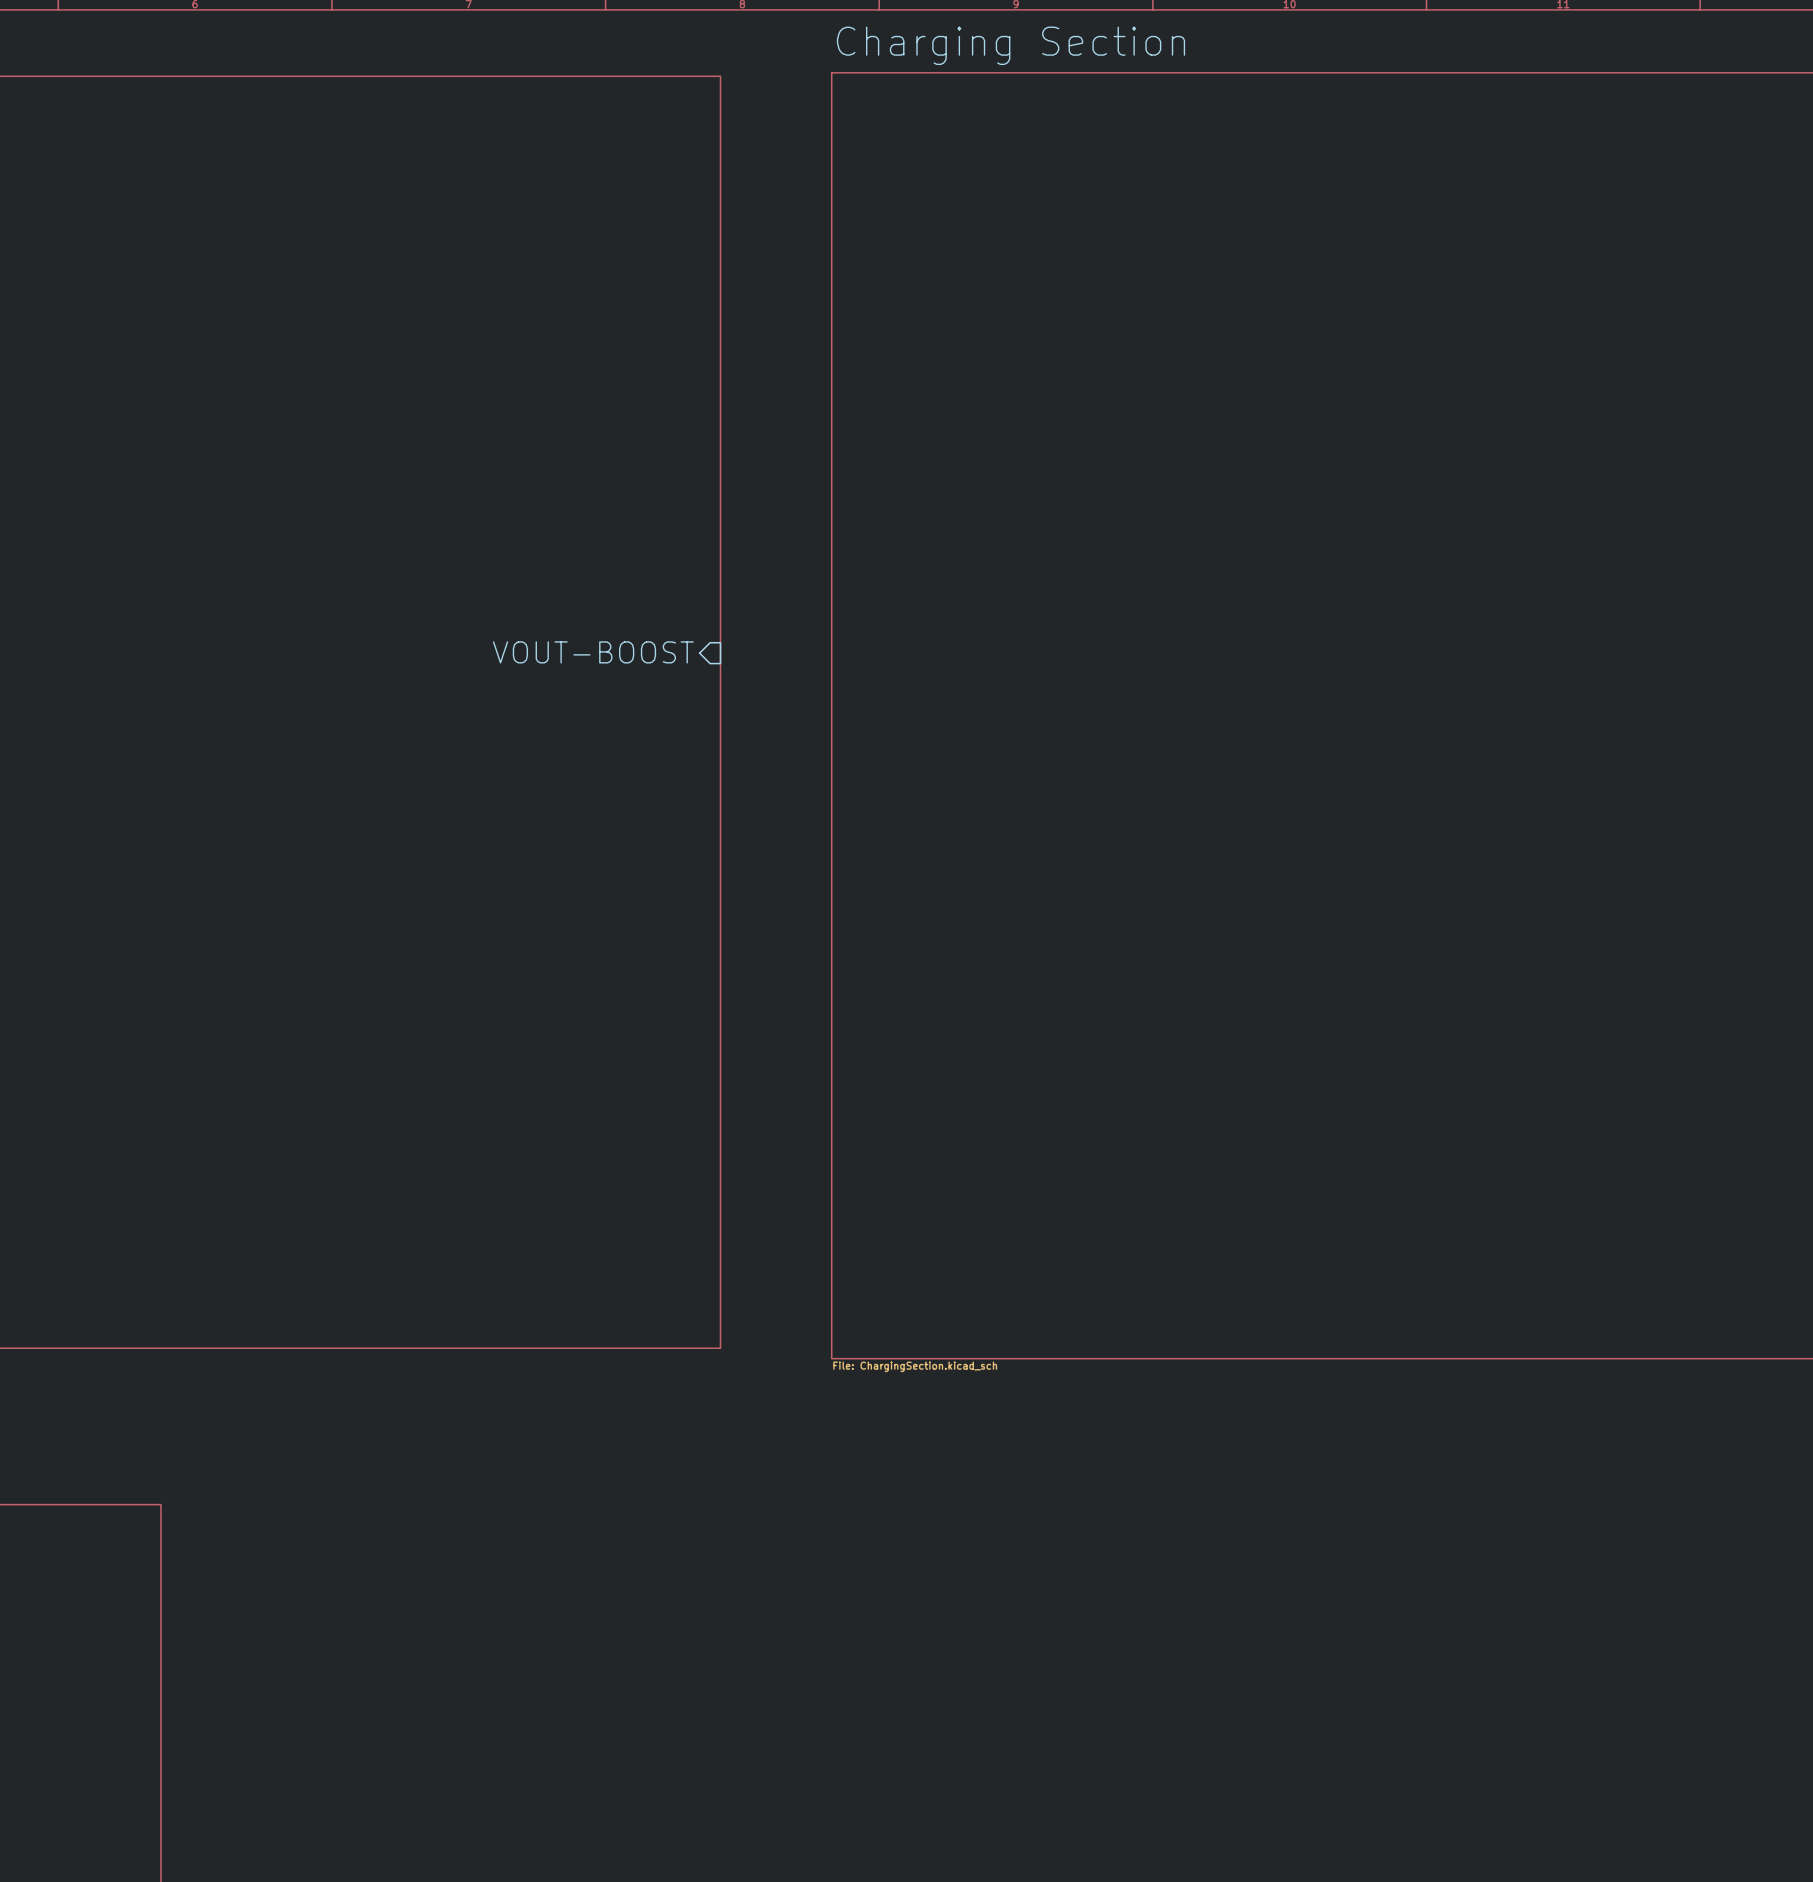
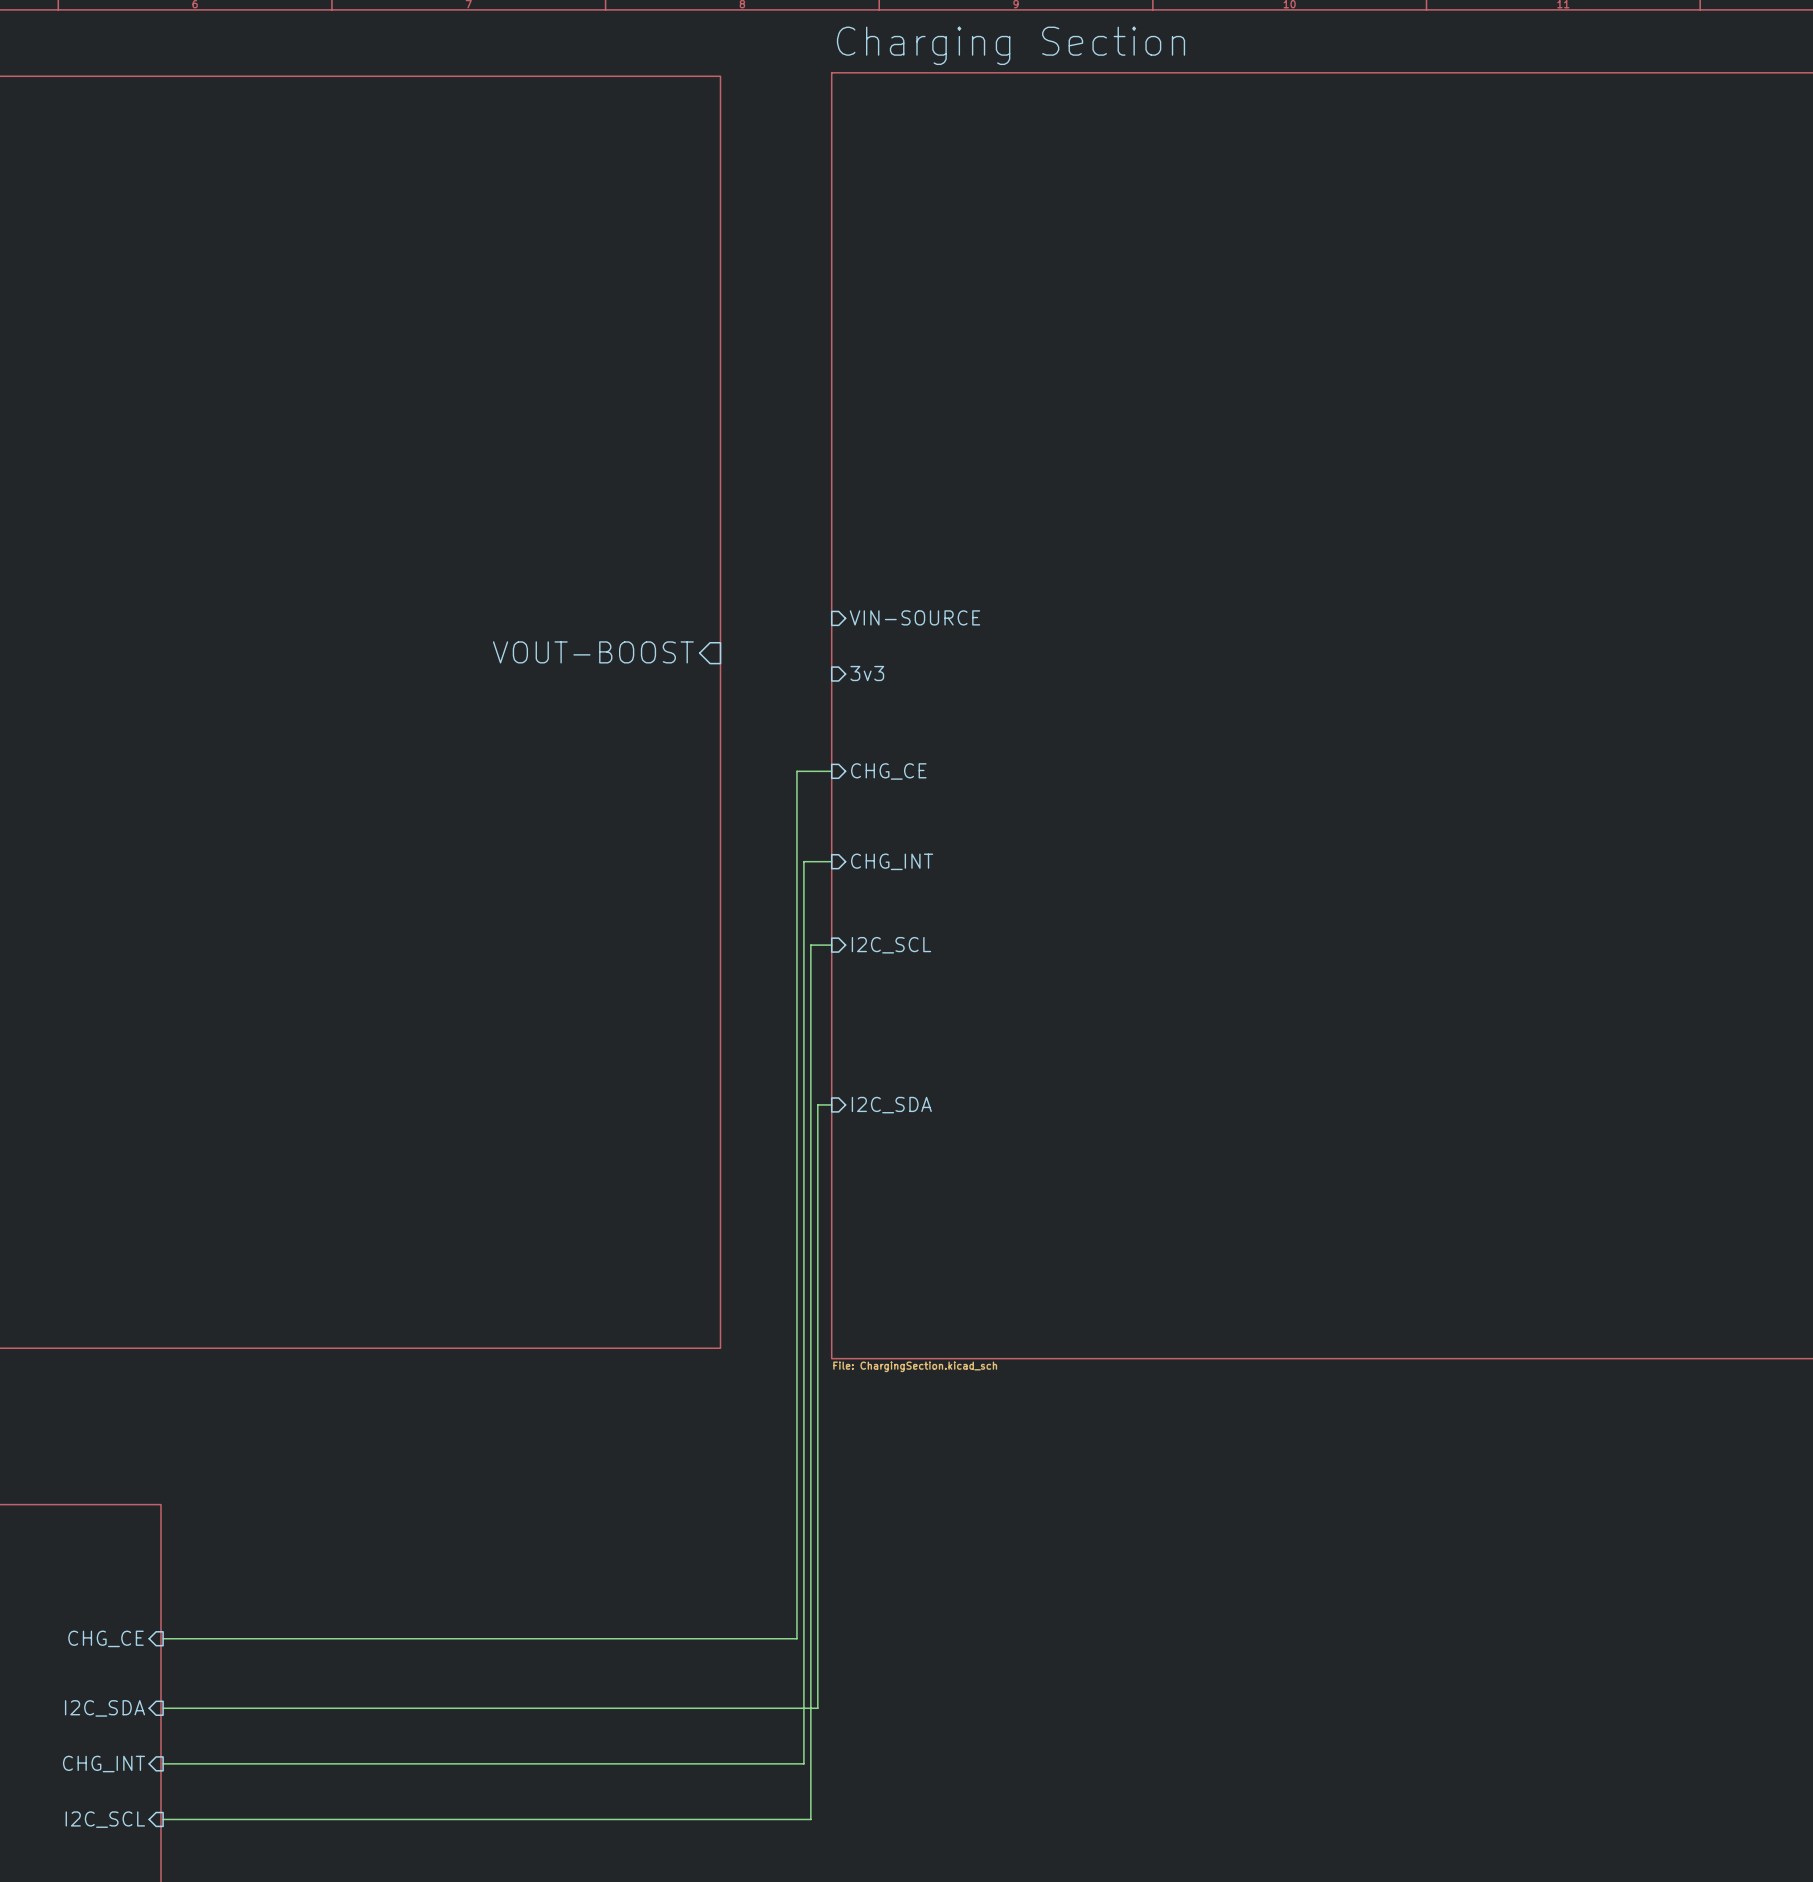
sheet pin: none -> VIN-SOURCE (914, 617)
sheet pin: none -> 3v3 (867, 673)
wire: none -> (831, 771) (796, 771) (796, 1638) (163, 1638)
sheet pin: none -> CHG_CE (888, 771)
wire: none -> (831, 861) (803, 861) (803, 1763) (163, 1763)
sheet pin: none -> CHG_INT (892, 861)
wire: none -> (831, 945) (810, 945) (810, 1819) (163, 1819)
sheet pin: none -> I2C_SCL (891, 945)
wire: none -> (831, 1104) (817, 1104) (817, 1708) (163, 1708)
sheet pin: none -> I2C_SDA (891, 1105)
sheet pin: none -> CHG_CE (105, 1638)
sheet pin: none -> I2C_SDA (104, 1708)
sheet pin: none -> CHG_INT (104, 1764)
sheet pin: none -> I2C_SCL (105, 1819)

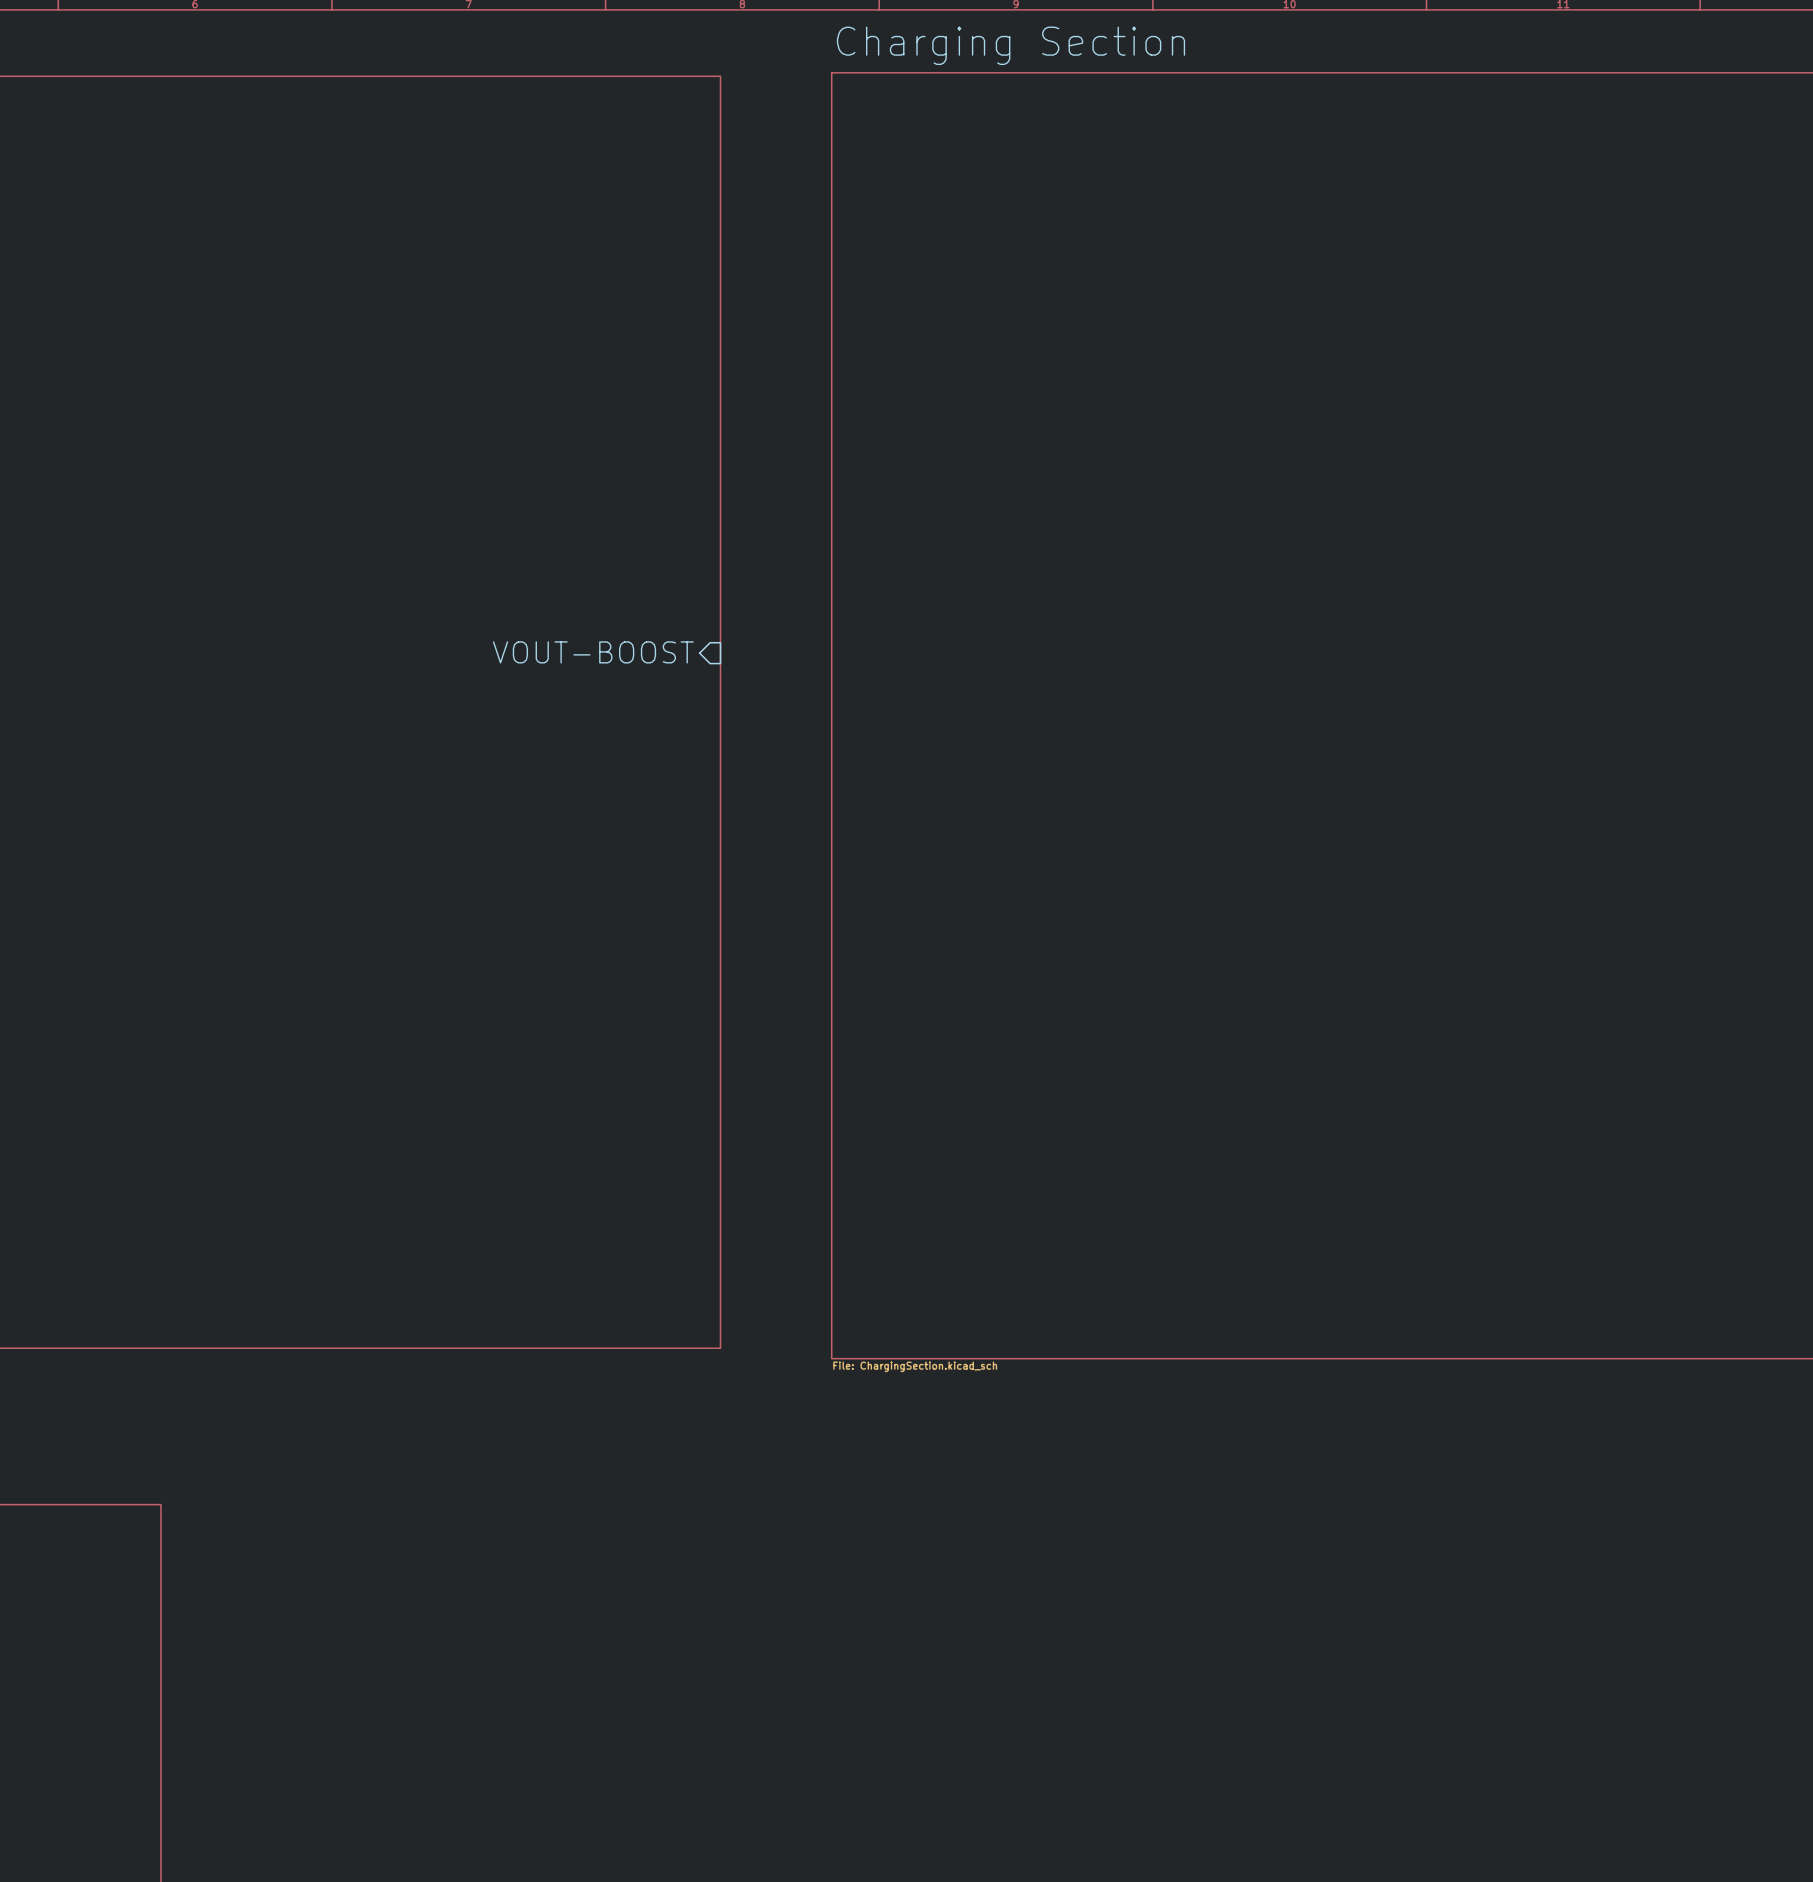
sheet pin: VIN-SOURCE (914, 617) -> none
sheet pin: 3v3 (867, 673) -> none
wire: (831, 771) (796, 771) (796, 1638) (163, 1638) -> none
sheet pin: CHG_CE (888, 771) -> none
wire: (831, 861) (803, 861) (803, 1763) (163, 1763) -> none
sheet pin: CHG_INT (892, 861) -> none
wire: (831, 945) (810, 945) (810, 1819) (163, 1819) -> none
sheet pin: I2C_SCL (891, 945) -> none
wire: (831, 1104) (817, 1104) (817, 1708) (163, 1708) -> none
sheet pin: I2C_SDA (891, 1105) -> none
sheet pin: CHG_CE (105, 1638) -> none
sheet pin: I2C_SDA (104, 1708) -> none
sheet pin: CHG_INT (104, 1764) -> none
sheet pin: I2C_SCL (105, 1819) -> none

